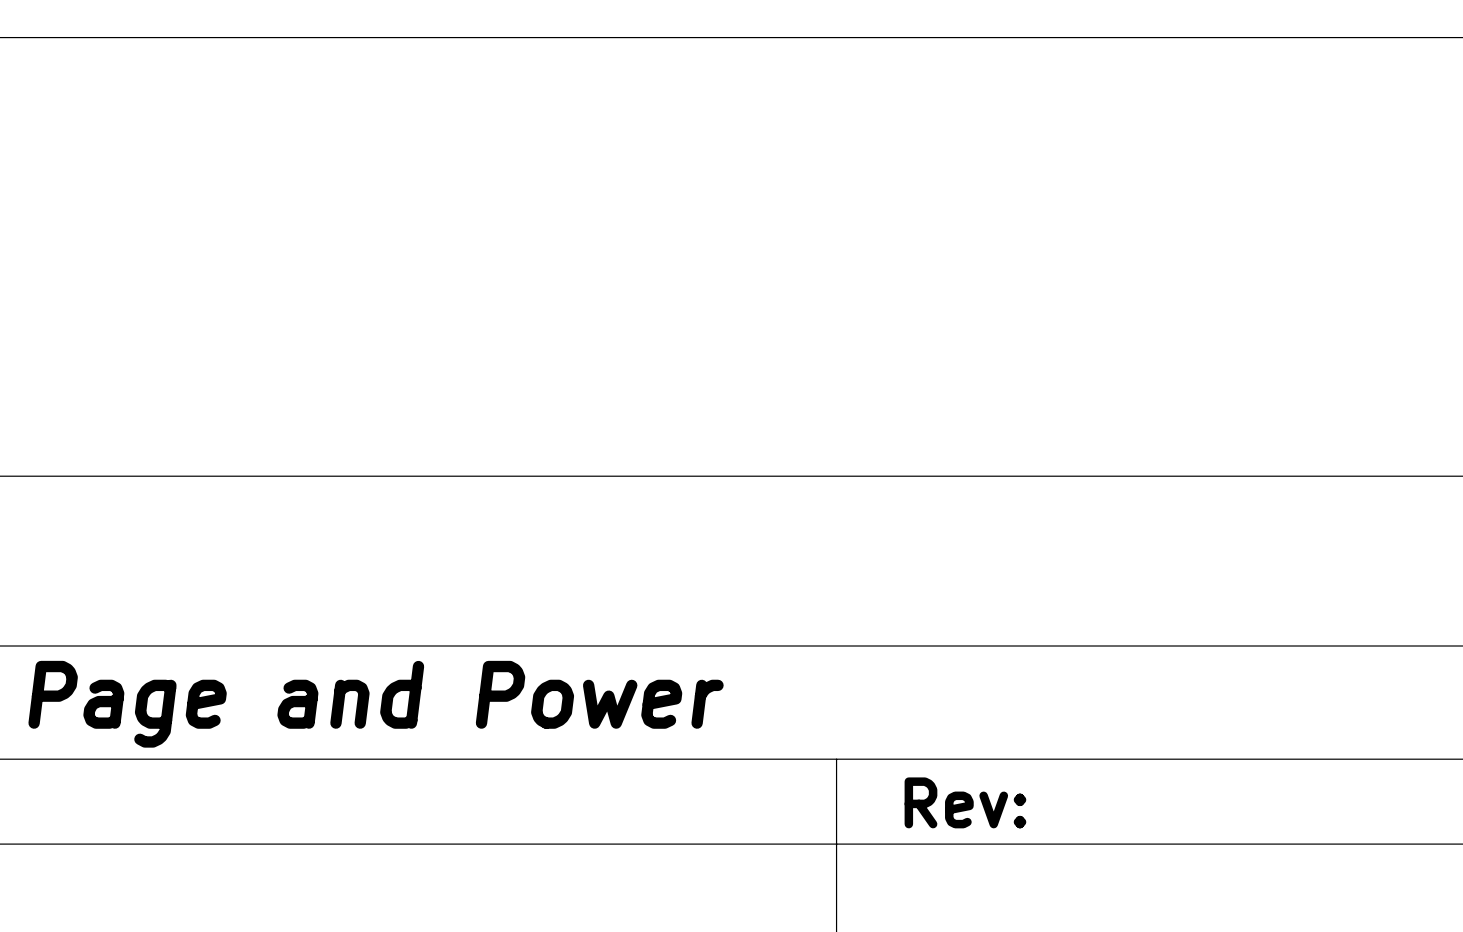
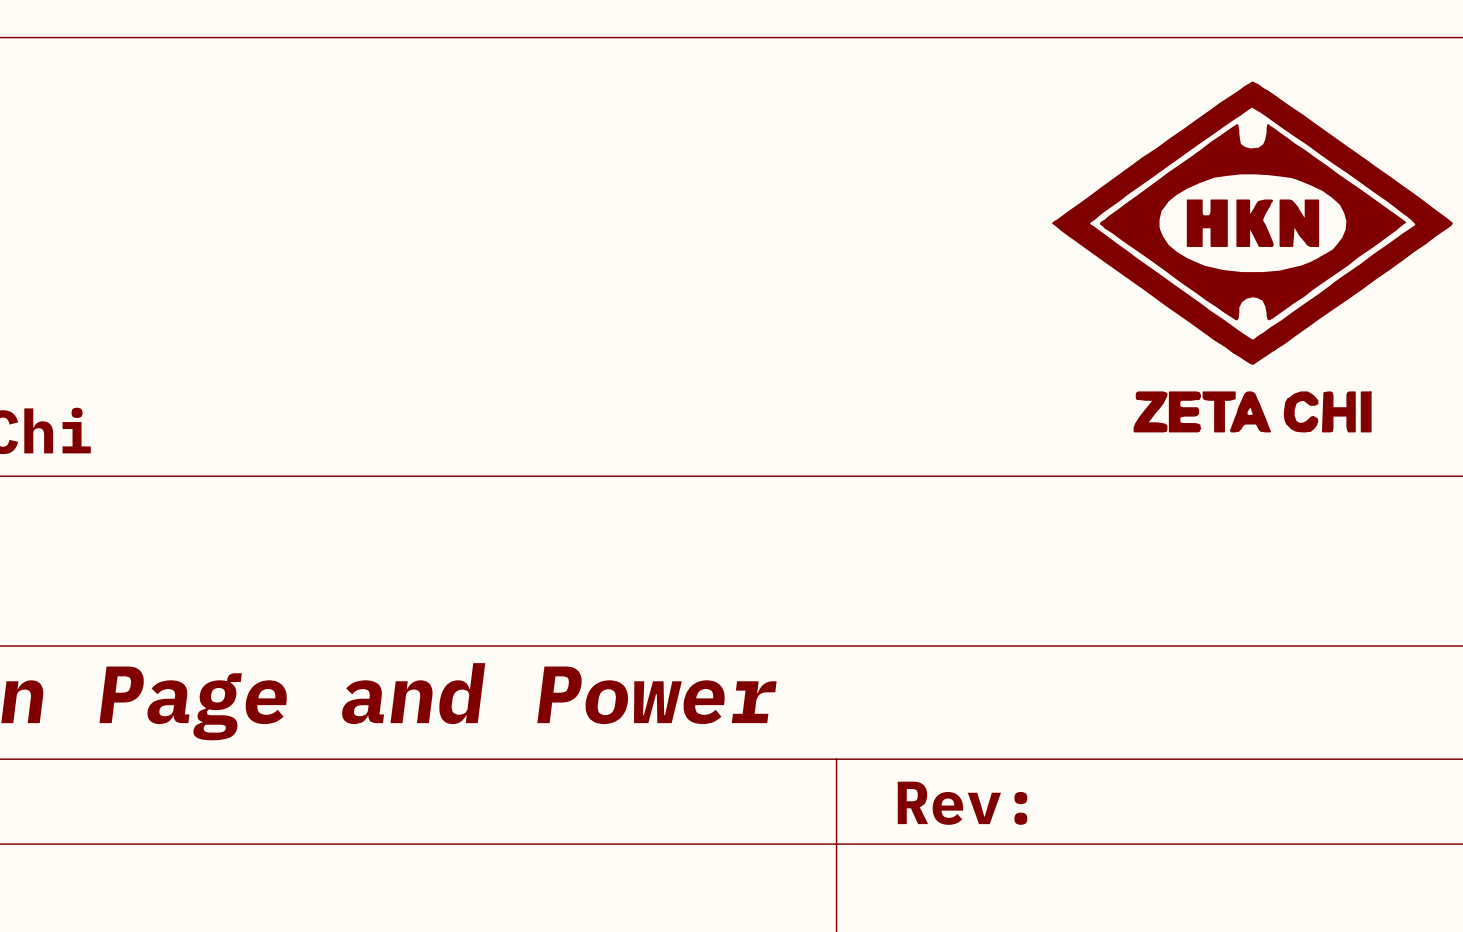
part: none -> (1252, 257)

